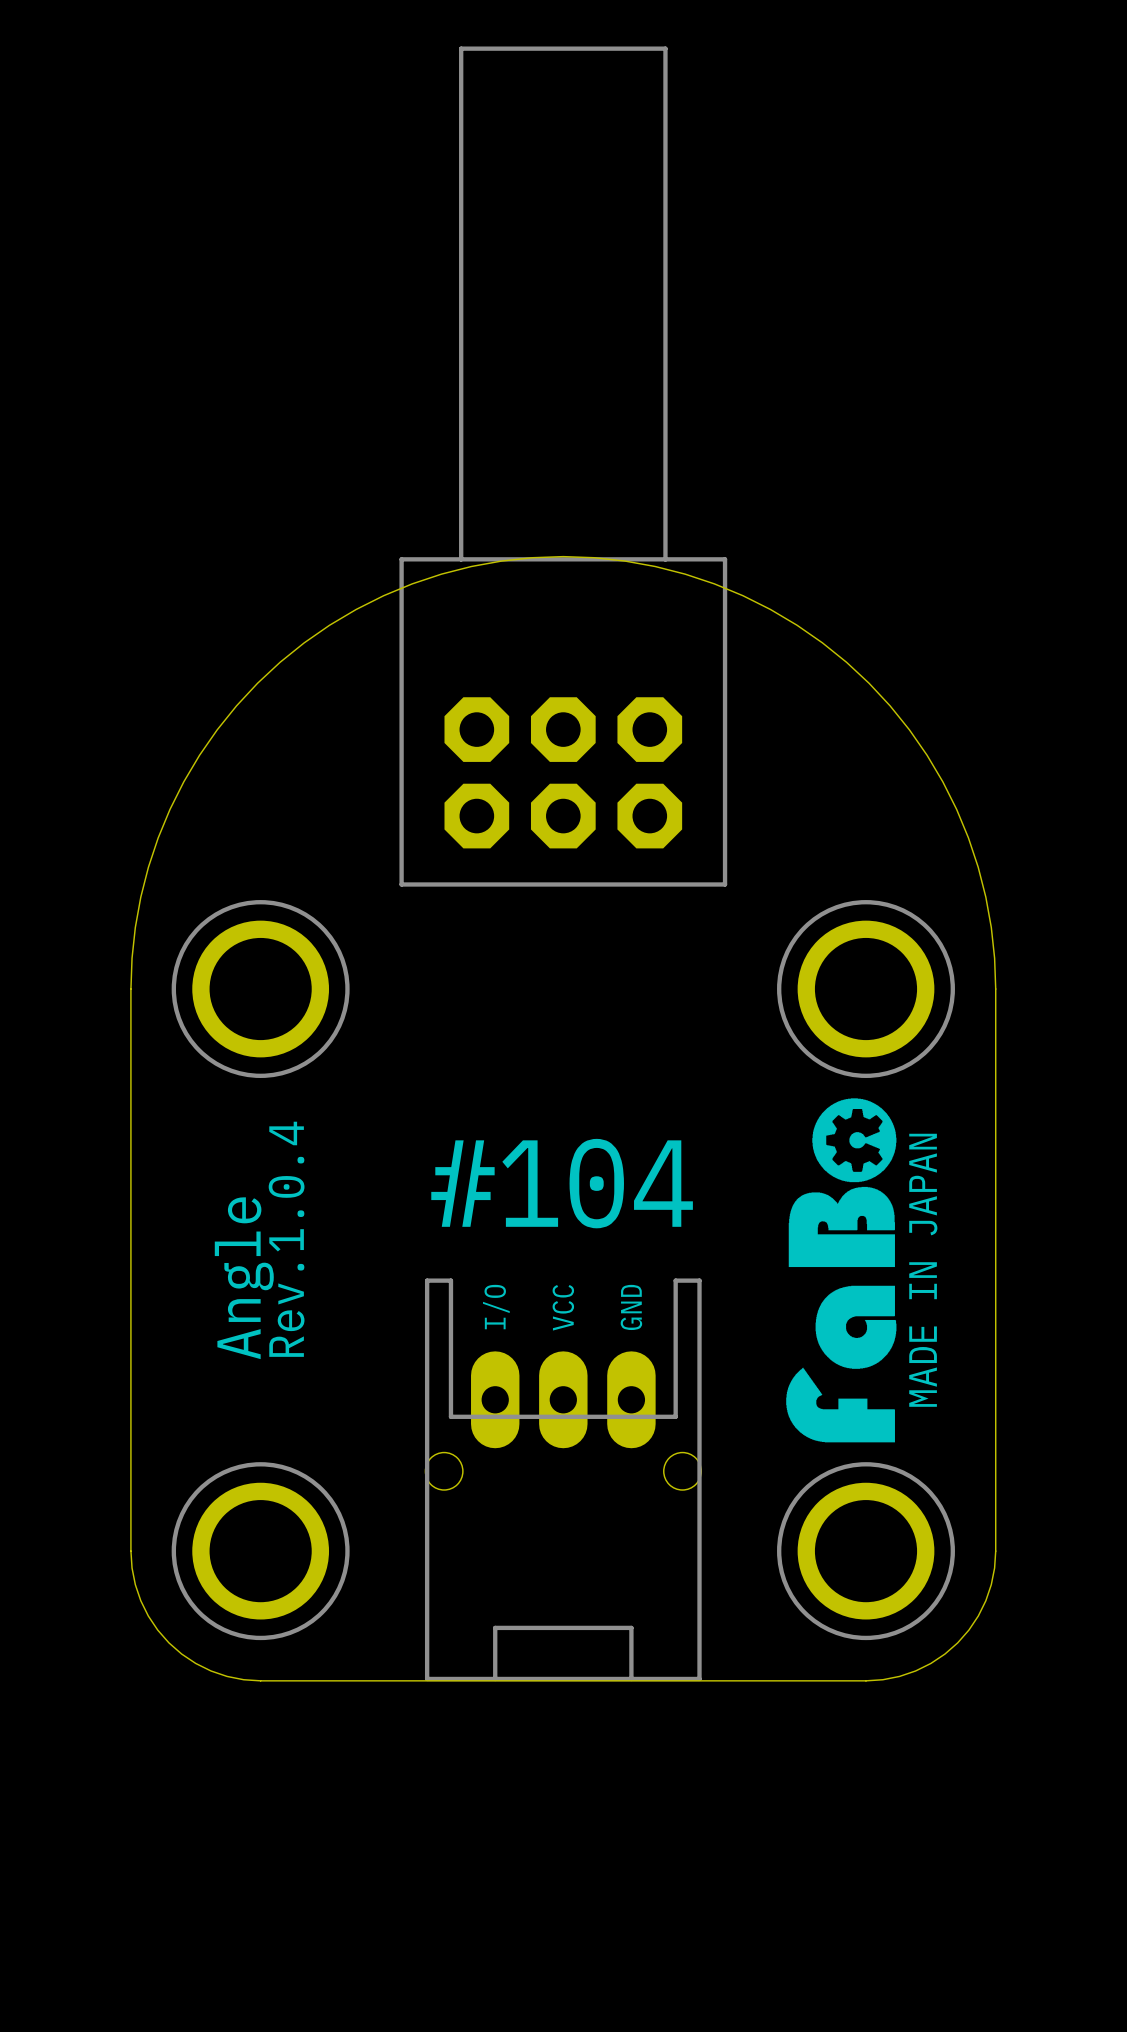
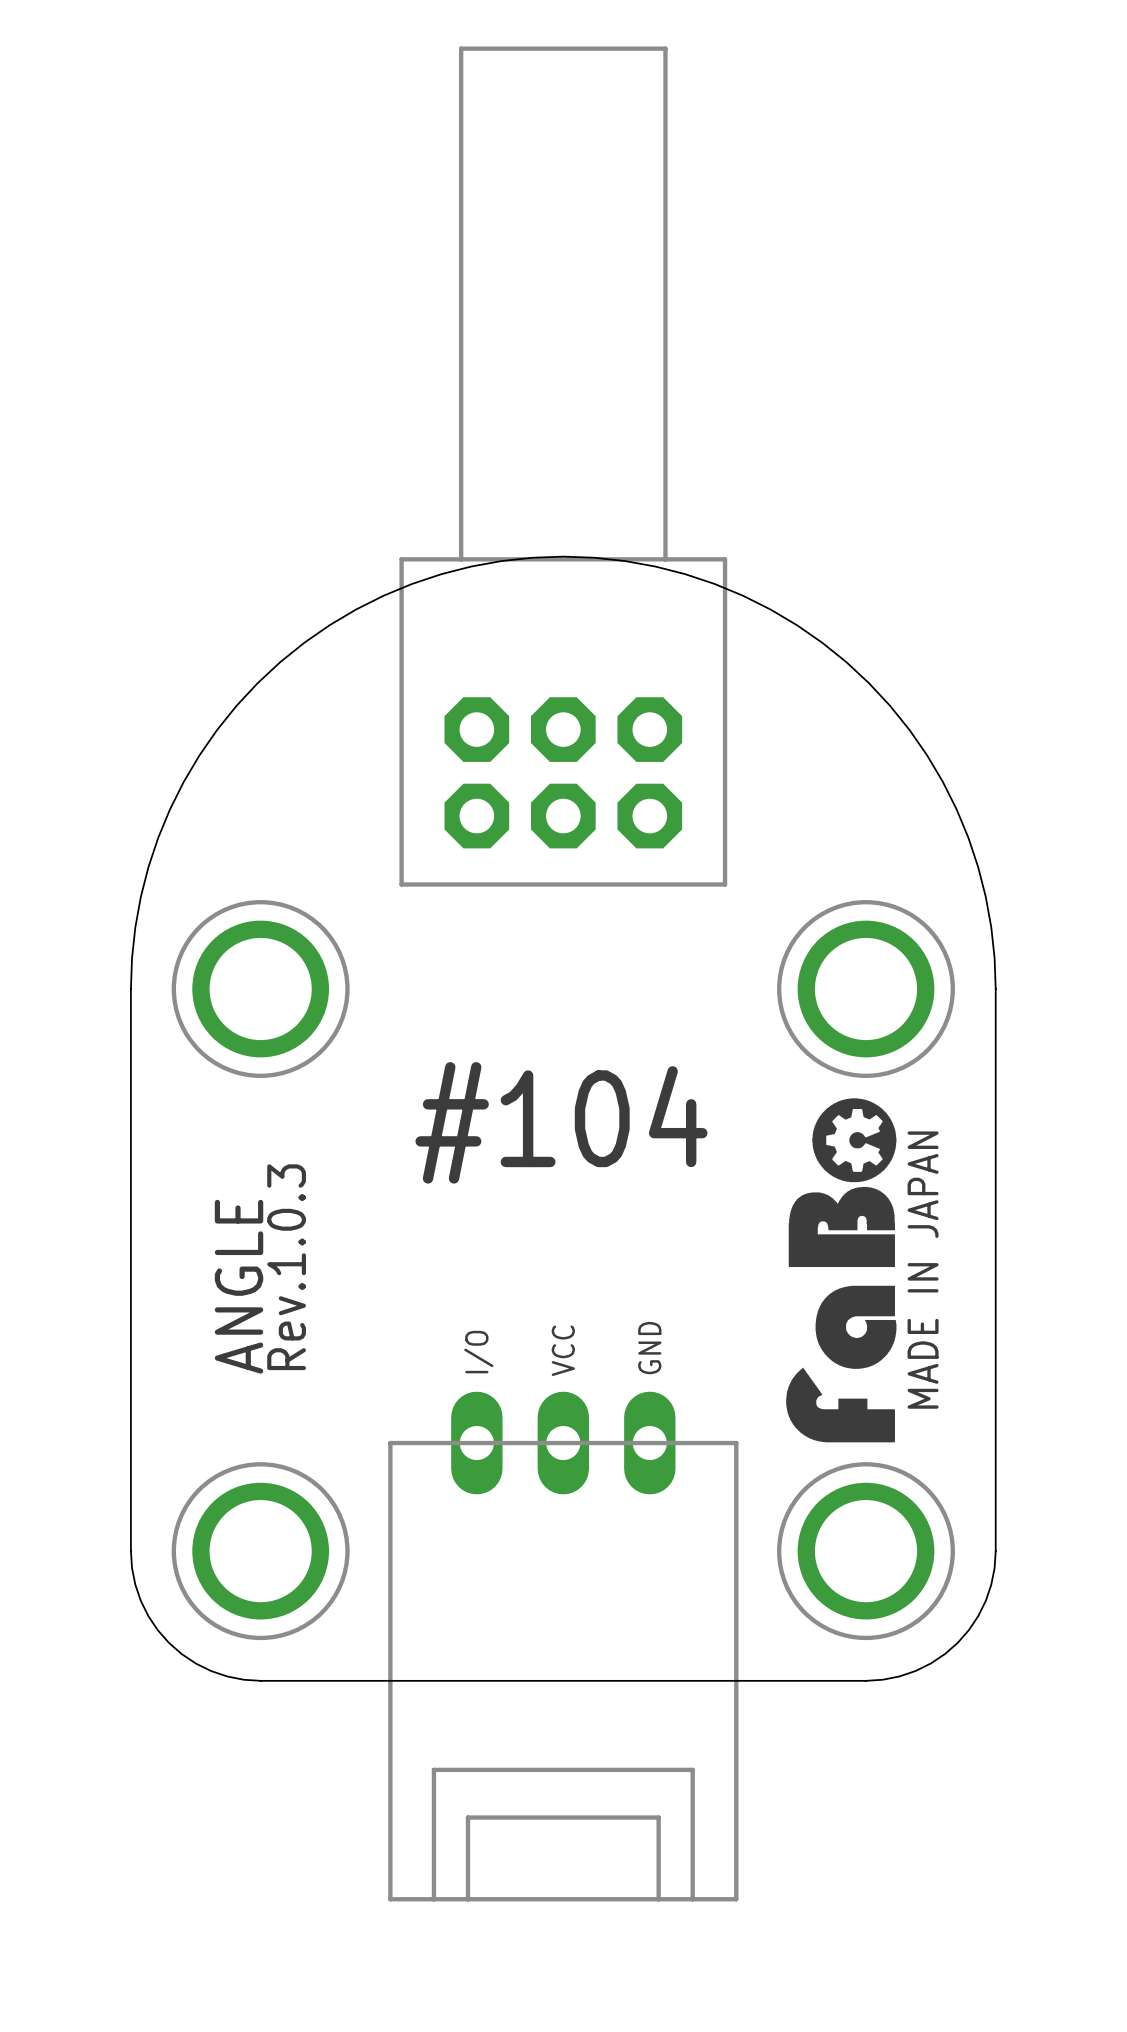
part: (563, 1118) -> none
text position: #104 (562, 1183) -> #104 (561, 1122)
part: none -> (563, 1229)
text: Rev.1.0.4 (286, 1239) -> Rev.1.0.3 (286, 1267)
text: Angle (244, 1278) -> ANGLE (239, 1286)

